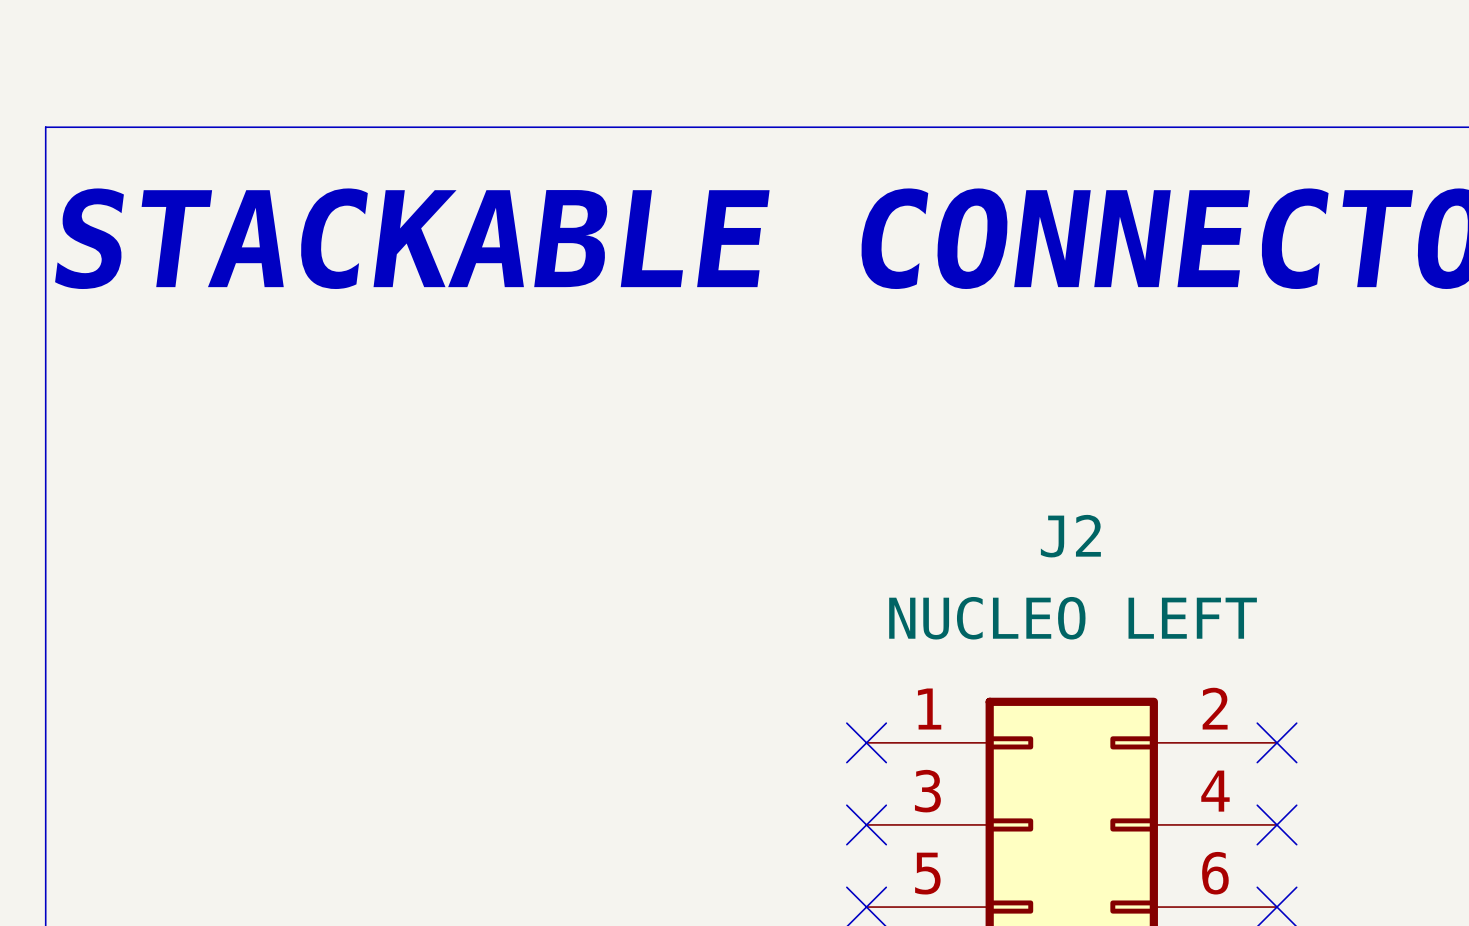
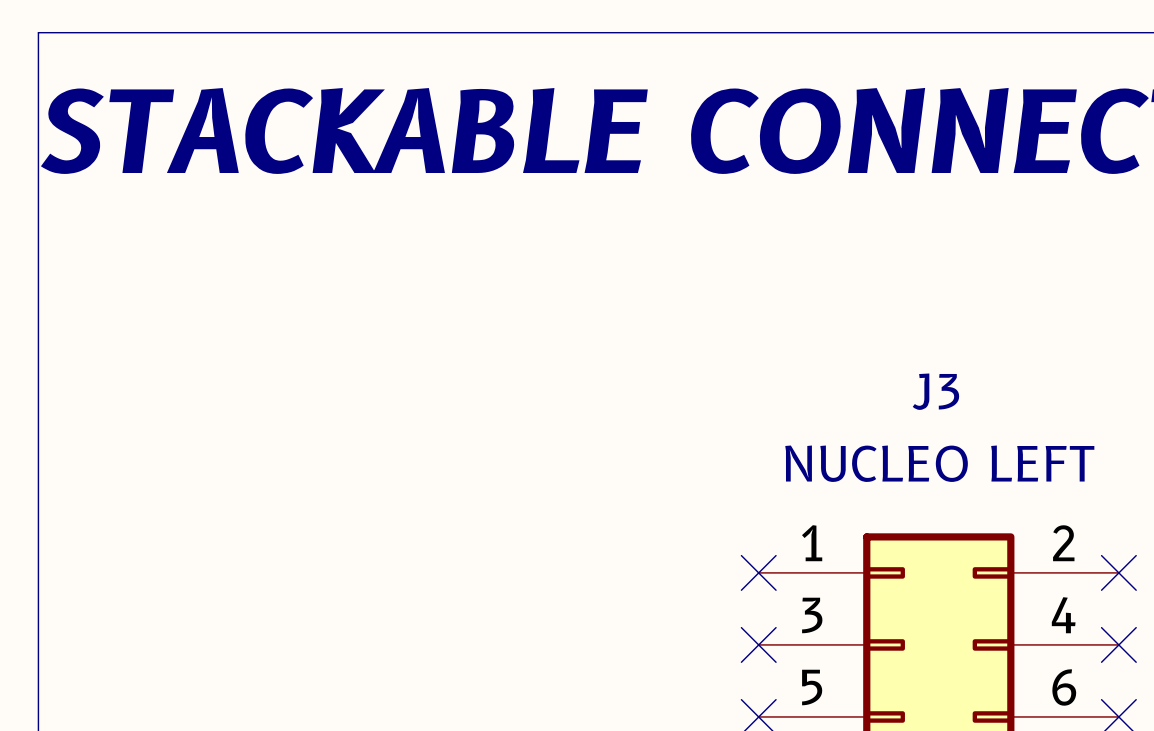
J2 name: J2 (1070, 536) -> J3 (935, 391)

